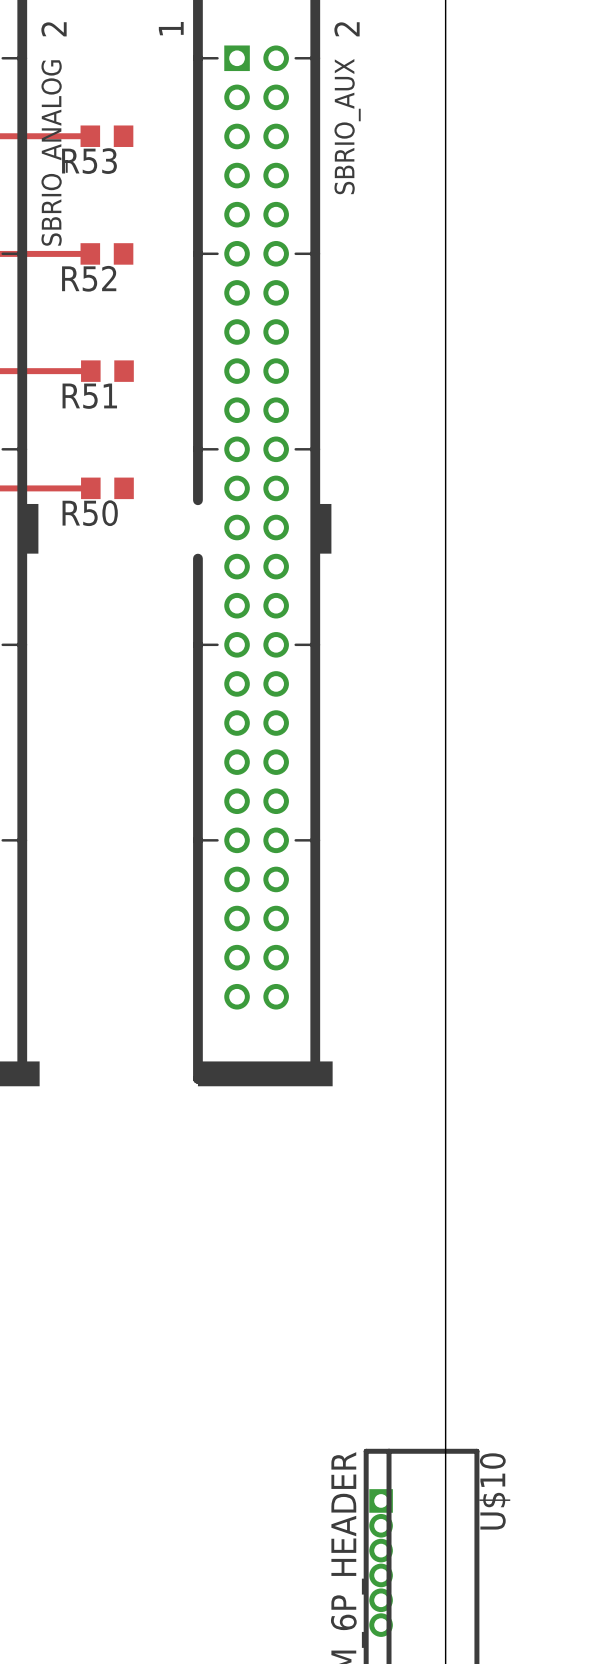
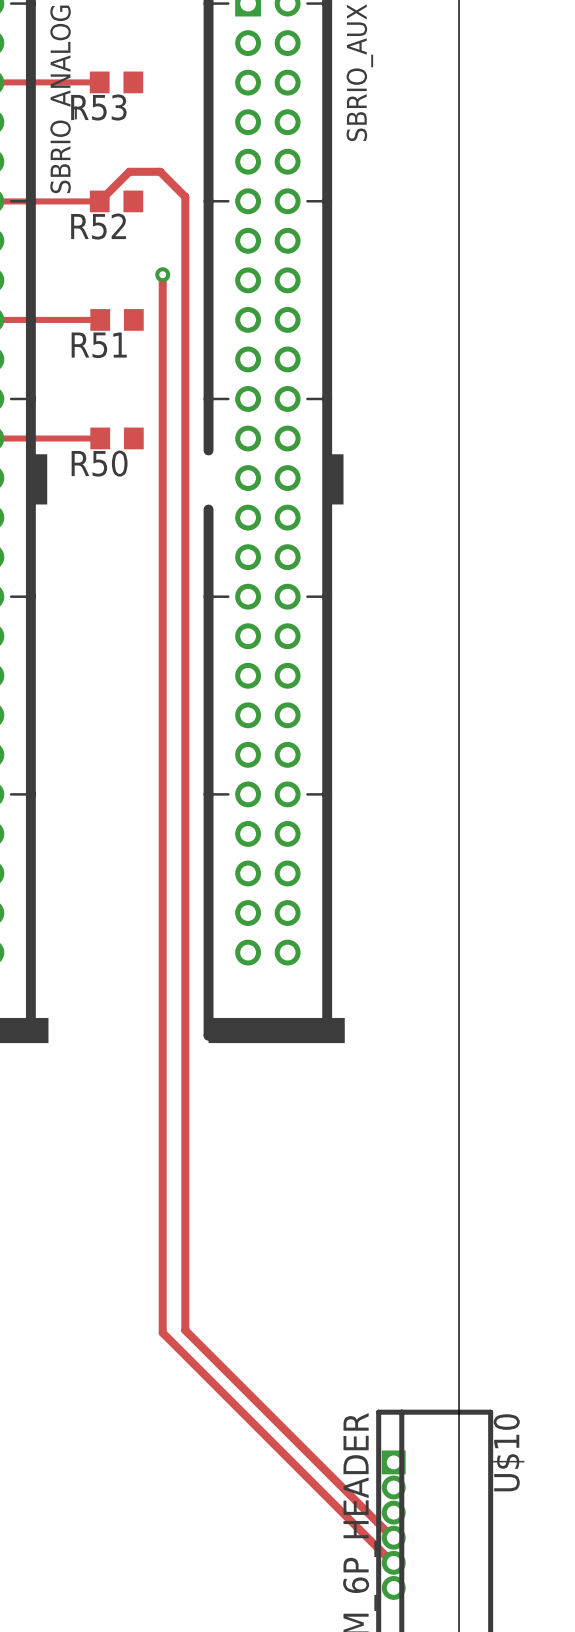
track: none -> (99, 201) (129, 171) (160, 171) (185, 196) (185, 1330) (393, 1537)
track: none -> (162, 274) (162, 1332) (393, 1562)
via: none -> (162, 274)

